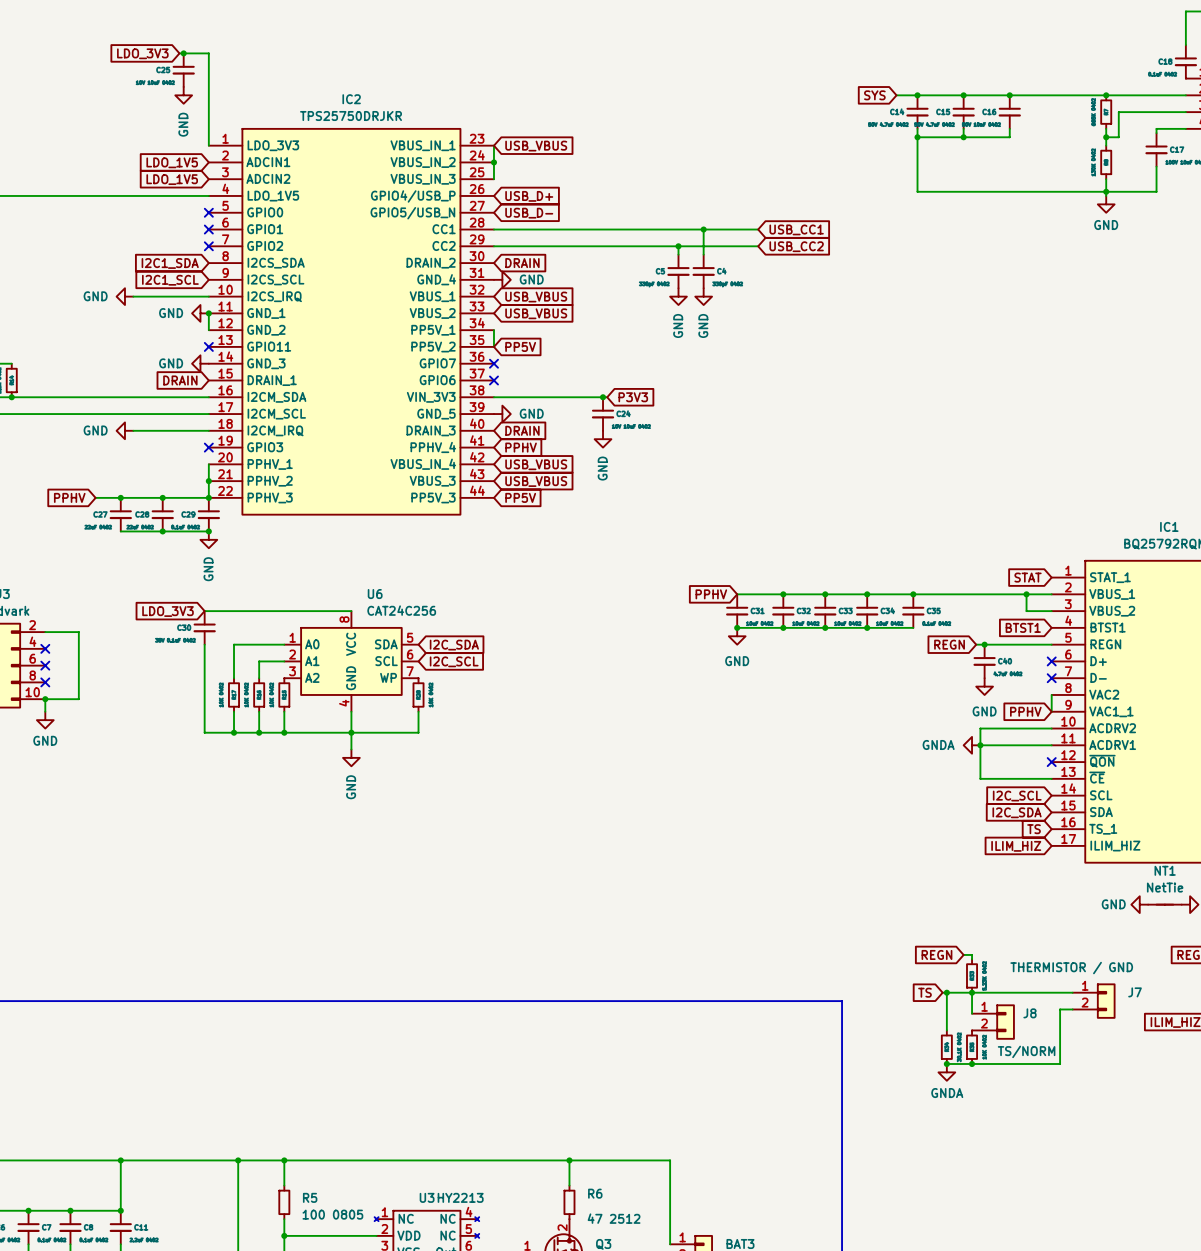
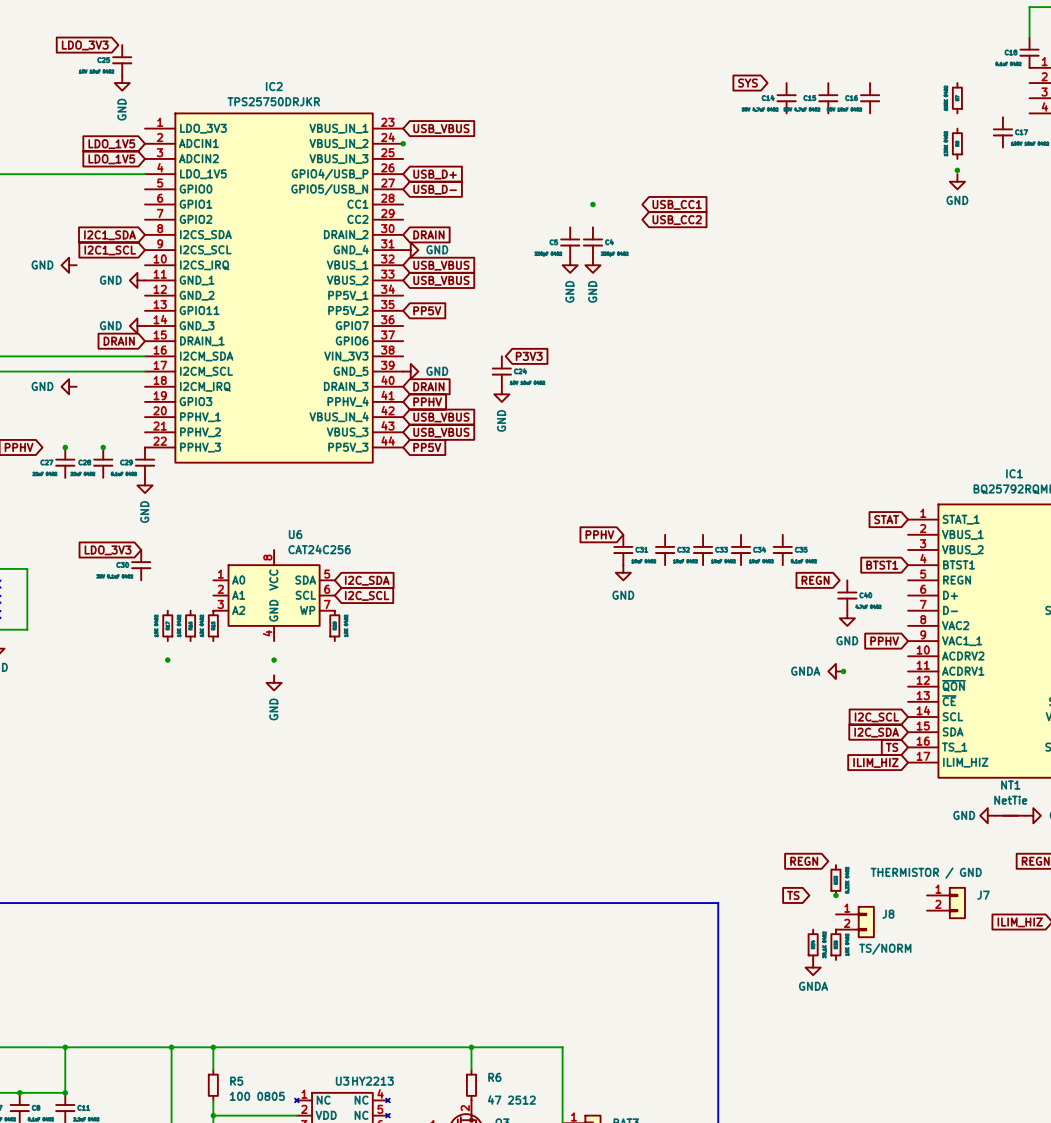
wire: (179, 53) (208, 53) (208, 145) -> none
junction: (183, 53) -> none
wire: (896, 95) (1185, 95) -> none
junction: (917, 95) -> none
junction: (963, 95) -> none
junction: (1009, 95) -> none
junction: (1106, 95) -> none
wire: (1185, 112) (1118, 112) (1118, 137) (1106, 137) -> none
wire: (917, 128) (917, 191) (1156, 191) (1156, 166) -> none
wire: (963, 128) (963, 137) -> none
wire: (1009, 128) (1009, 137) (917, 137) -> none
wire: (1106, 128) (1106, 145) -> none
wire: (1185, 128) (1156, 128) (1156, 133) -> none
junction: (917, 137) -> none
junction: (963, 137) -> none
junction: (1106, 137) -> none
wire: (493, 145) (493, 179) -> none
wire: (1106, 179) (1106, 195) -> none
no-connect mark: (208, 212) -> none
no-connect mark: (208, 229) -> none
wire: (493, 229) (758, 229) -> none
wire: (703, 229) (703, 254) -> none
no-connect mark: (208, 246) -> none
wire: (493, 246) (758, 246) -> none
wire: (678, 246) (678, 254) -> none
junction: (678, 246) -> none
wire: (133, 296) (208, 296) -> none
wire: (208, 313) (208, 330) -> none
junction: (208, 313) -> none
wire: (493, 330) (493, 346) -> none
no-connect mark: (208, 346) -> none
no-connect mark: (493, 363) -> none
no-connect mark: (493, 380) -> none
wire: (493, 397) (607, 397) -> none
junction: (603, 397) -> none
wire: (133, 430) (208, 430) -> none
no-connect mark: (208, 447) -> none
wire: (208, 464) (208, 497) (95, 497) -> none
junction: (208, 481) -> none
junction: (208, 497) -> none
wire: (120, 531) (208, 531) -> none
junction: (162, 531) -> none
junction: (208, 531) -> none
wire: (737, 594) (1051, 594) -> none
junction: (783, 594) -> none
junction: (825, 594) -> none
junction: (867, 594) -> none
junction: (913, 594) -> none
wire: (1026, 594) (1026, 611) (1051, 611) -> none
junction: (1026, 594) -> none
wire: (204, 611) (351, 611) -> none
wire: (737, 627) (913, 627) -> none
junction: (737, 627) -> none
junction: (783, 627) -> none
junction: (825, 627) -> none
junction: (867, 627) -> none
wire: (204, 644) (204, 732) (418, 732) (418, 711) -> none
wire: (284, 644) (234, 644) (234, 678) -> none
wire: (976, 644) (1051, 644) -> none
junction: (984, 644) -> none
wire: (284, 661) (259, 661) (259, 678) -> none
no-connect mark: (1051, 661) -> none
no-connect mark: (1051, 678) -> none
wire: (1051, 694) (1051, 711) -> none
wire: (234, 711) (234, 732) -> none
wire: (259, 711) (259, 732) -> none
wire: (284, 711) (284, 732) -> none
wire: (351, 711) (351, 749) -> none
wire: (1051, 728) (980, 728) (980, 778) (1051, 778) -> none
junction: (259, 732) -> none
junction: (284, 732) -> none
wire: (980, 745) (1051, 745) -> none
no-connect mark: (1051, 762) -> none
wire: (963, 954) (972, 954) (972, 959) -> none
wire: (942, 992) (1072, 992) -> none
wire: (946, 992) (946, 1030) -> none
junction: (946, 992) -> none
wire: (972, 992) (972, 1013) -> none
wire: (1072, 1009) (1060, 1009) (1060, 1063) (946, 1063) -> none
junction: (946, 1063) -> none
junction: (972, 1063) -> none

